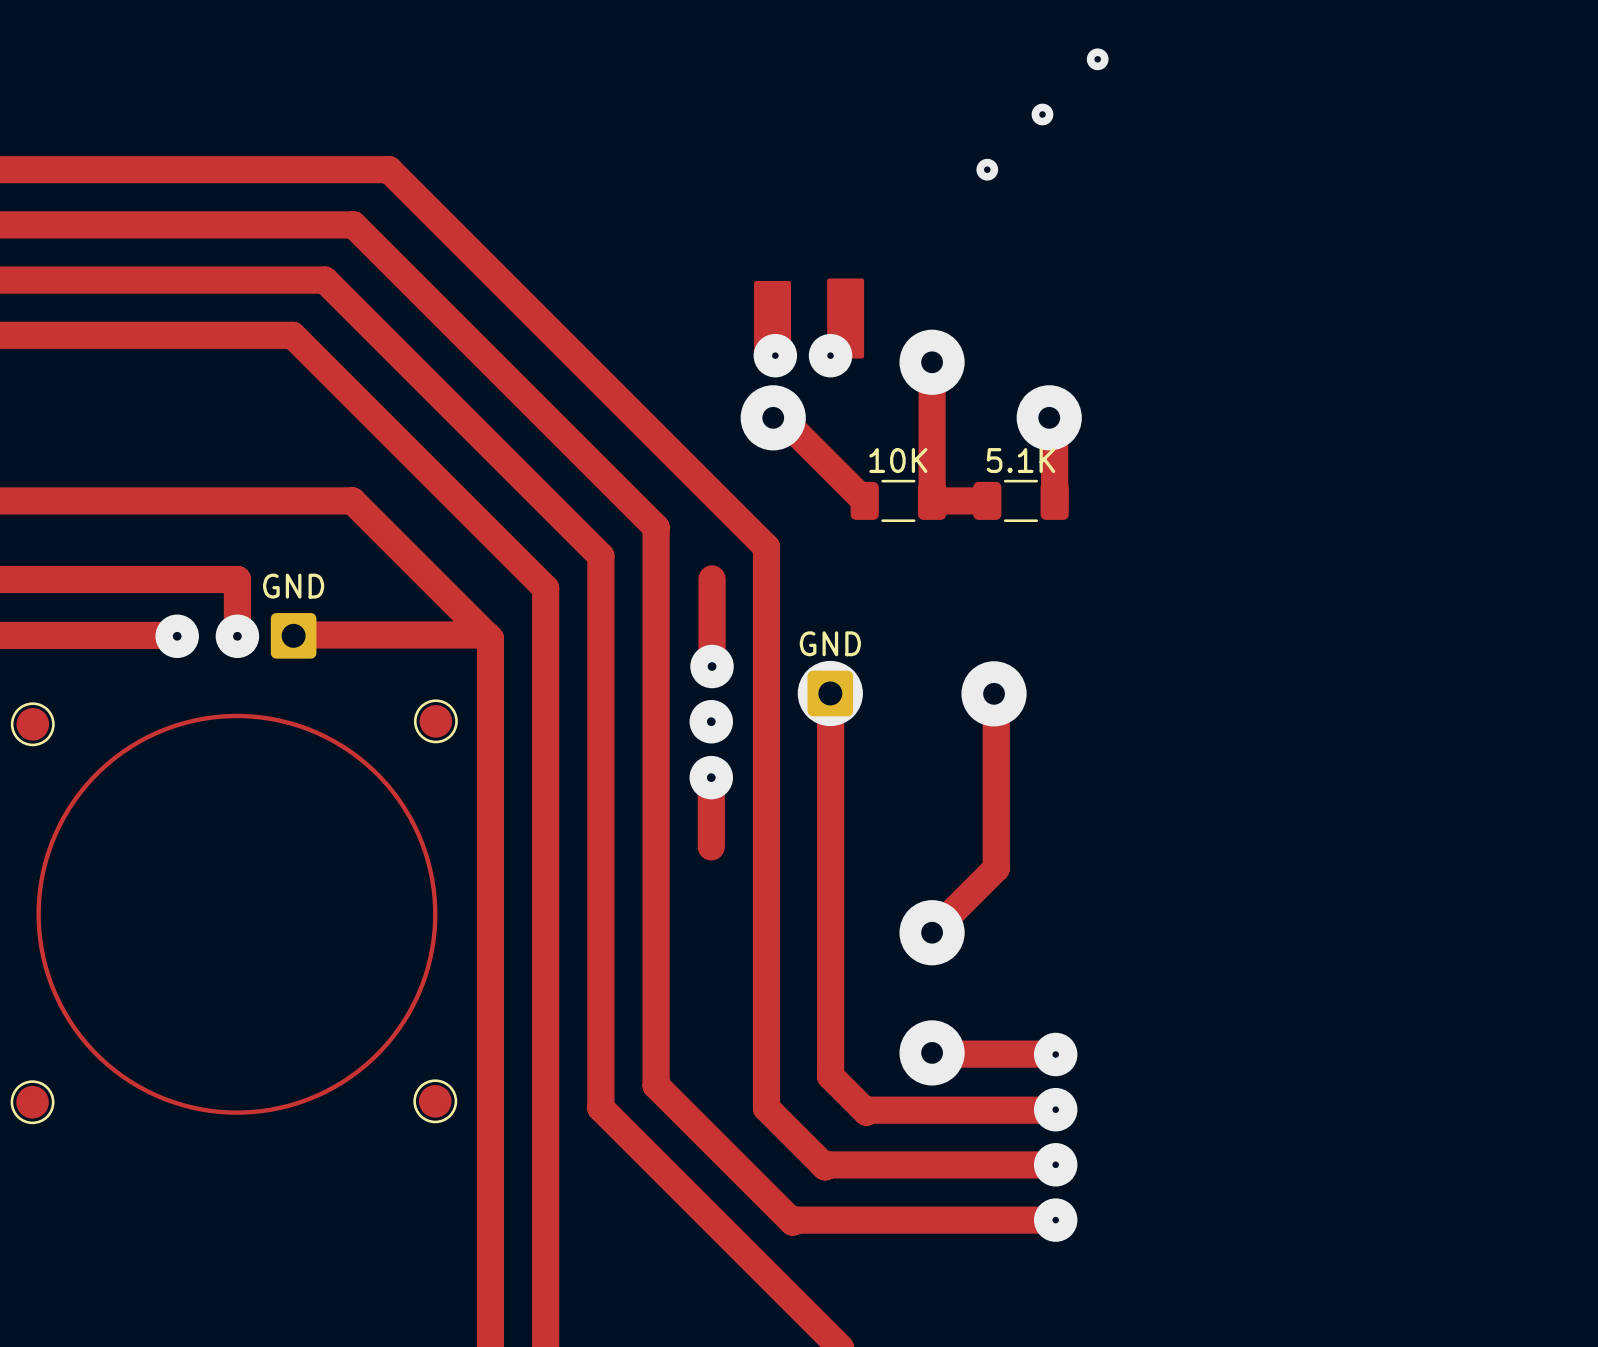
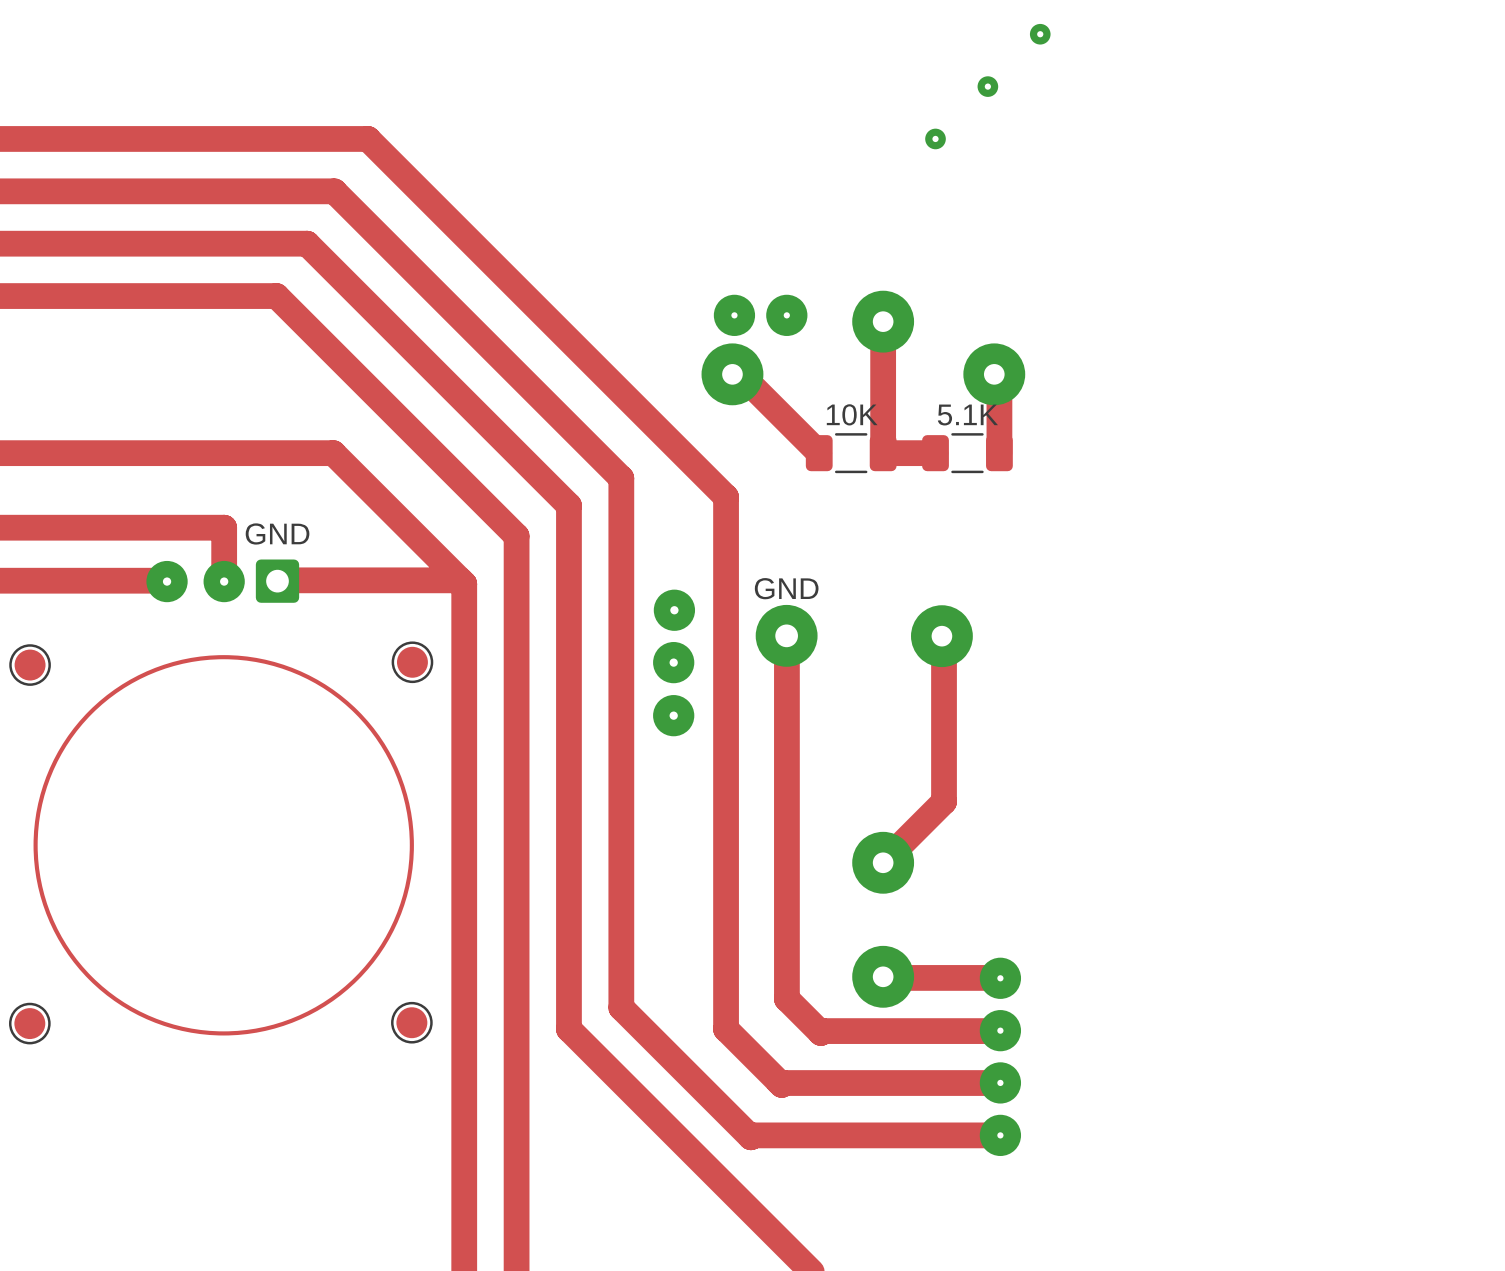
drawing: [827, 278, 865, 359] -> none
drawing: [754, 281, 792, 362] -> none
track: (712, 578) (712, 666) -> none
track: (711, 777) (711, 846) -> none

